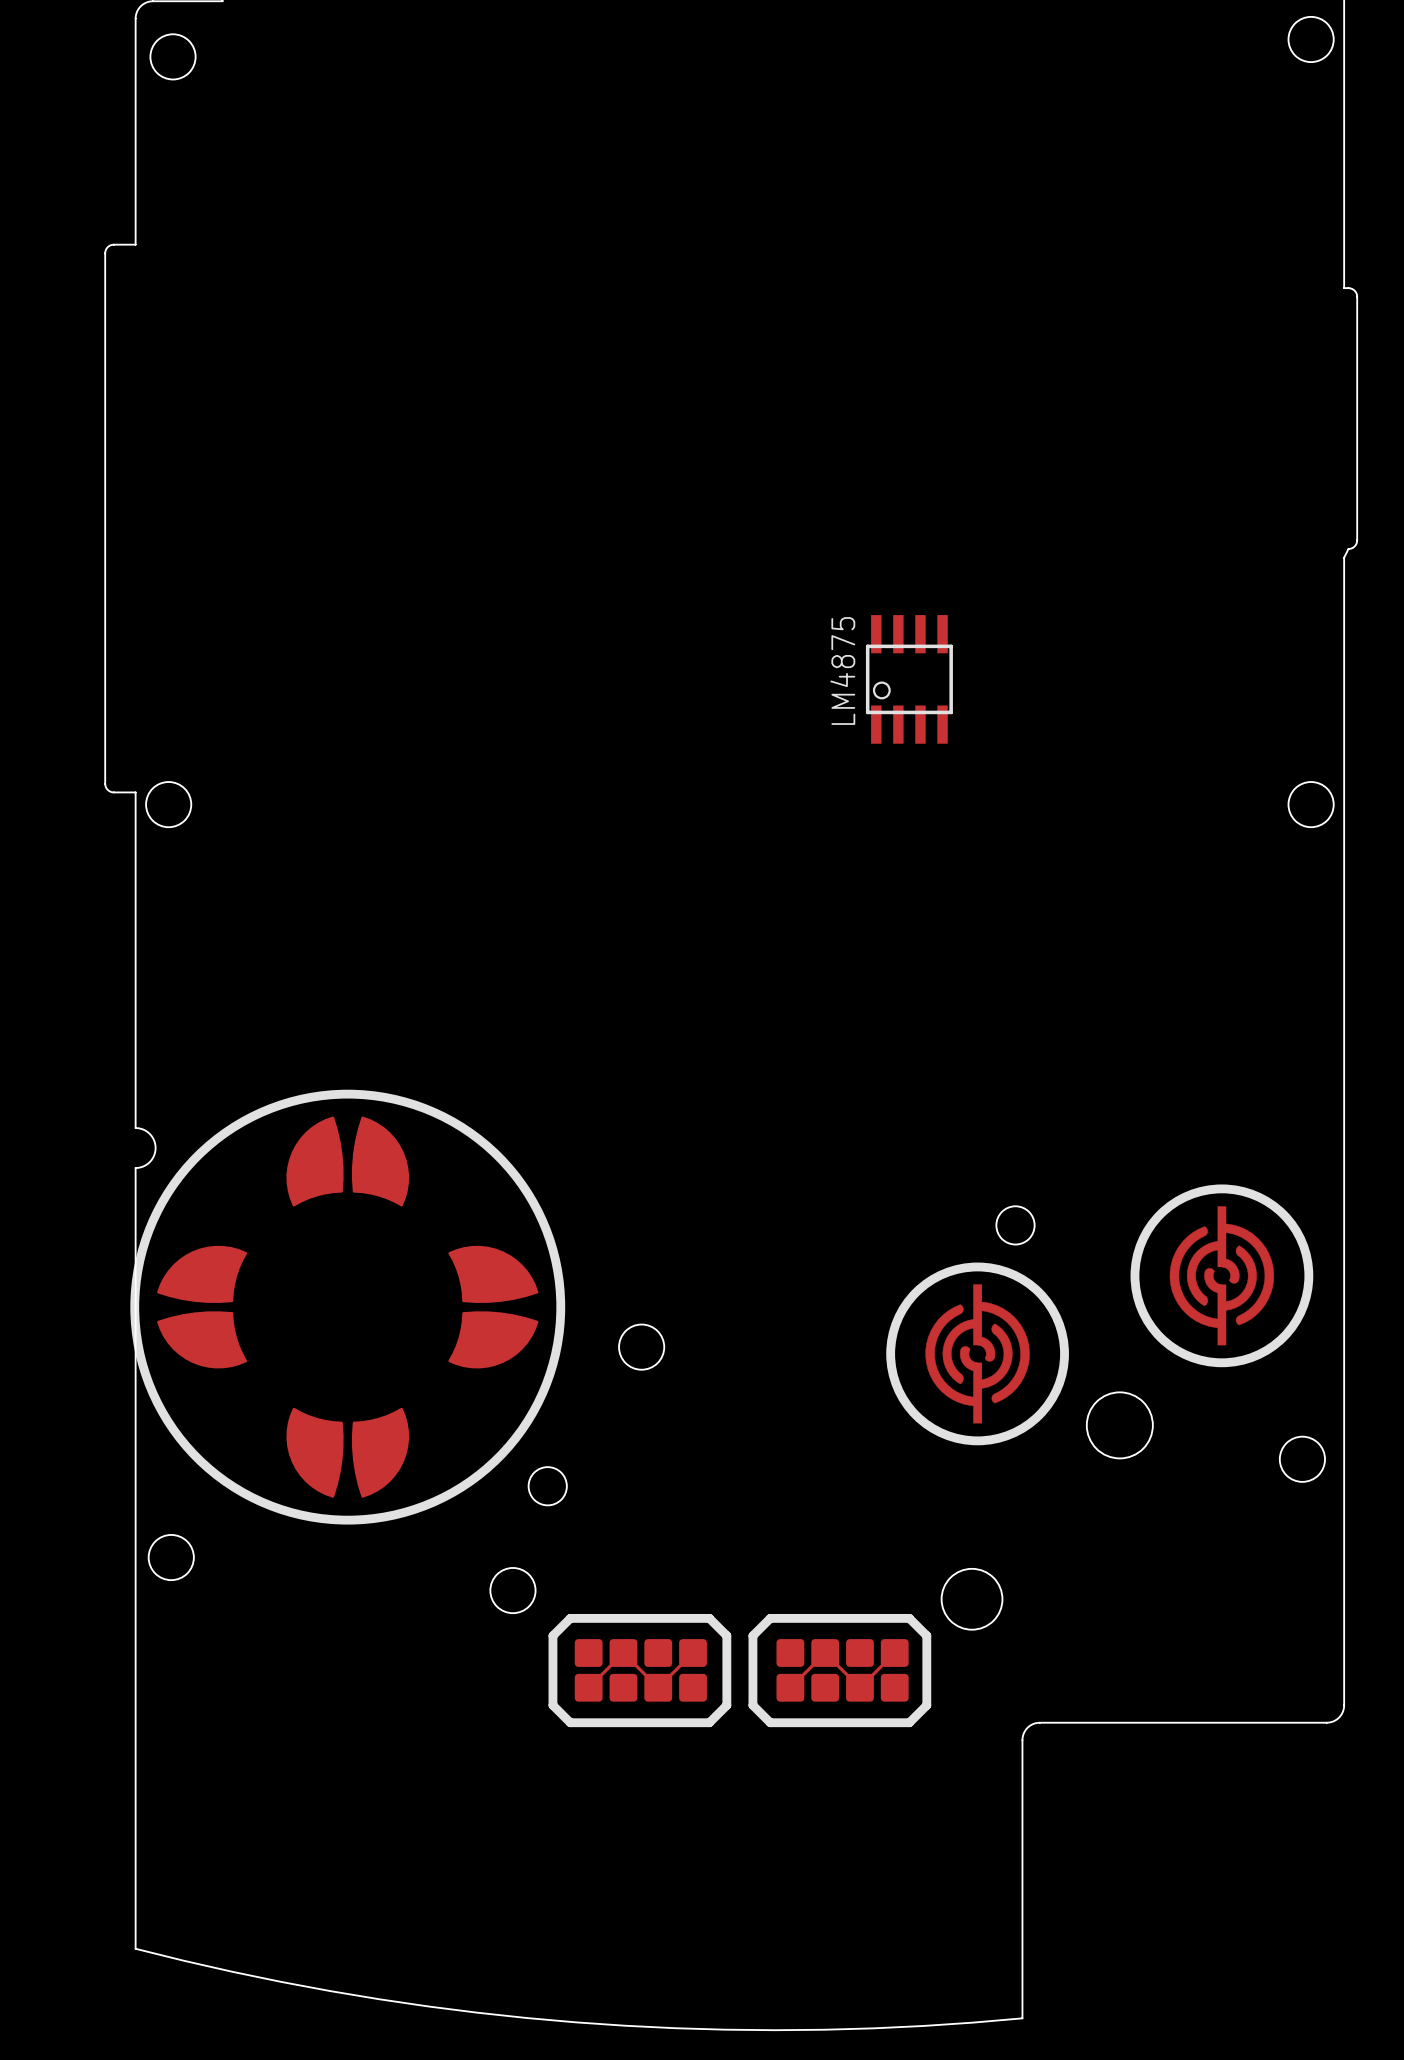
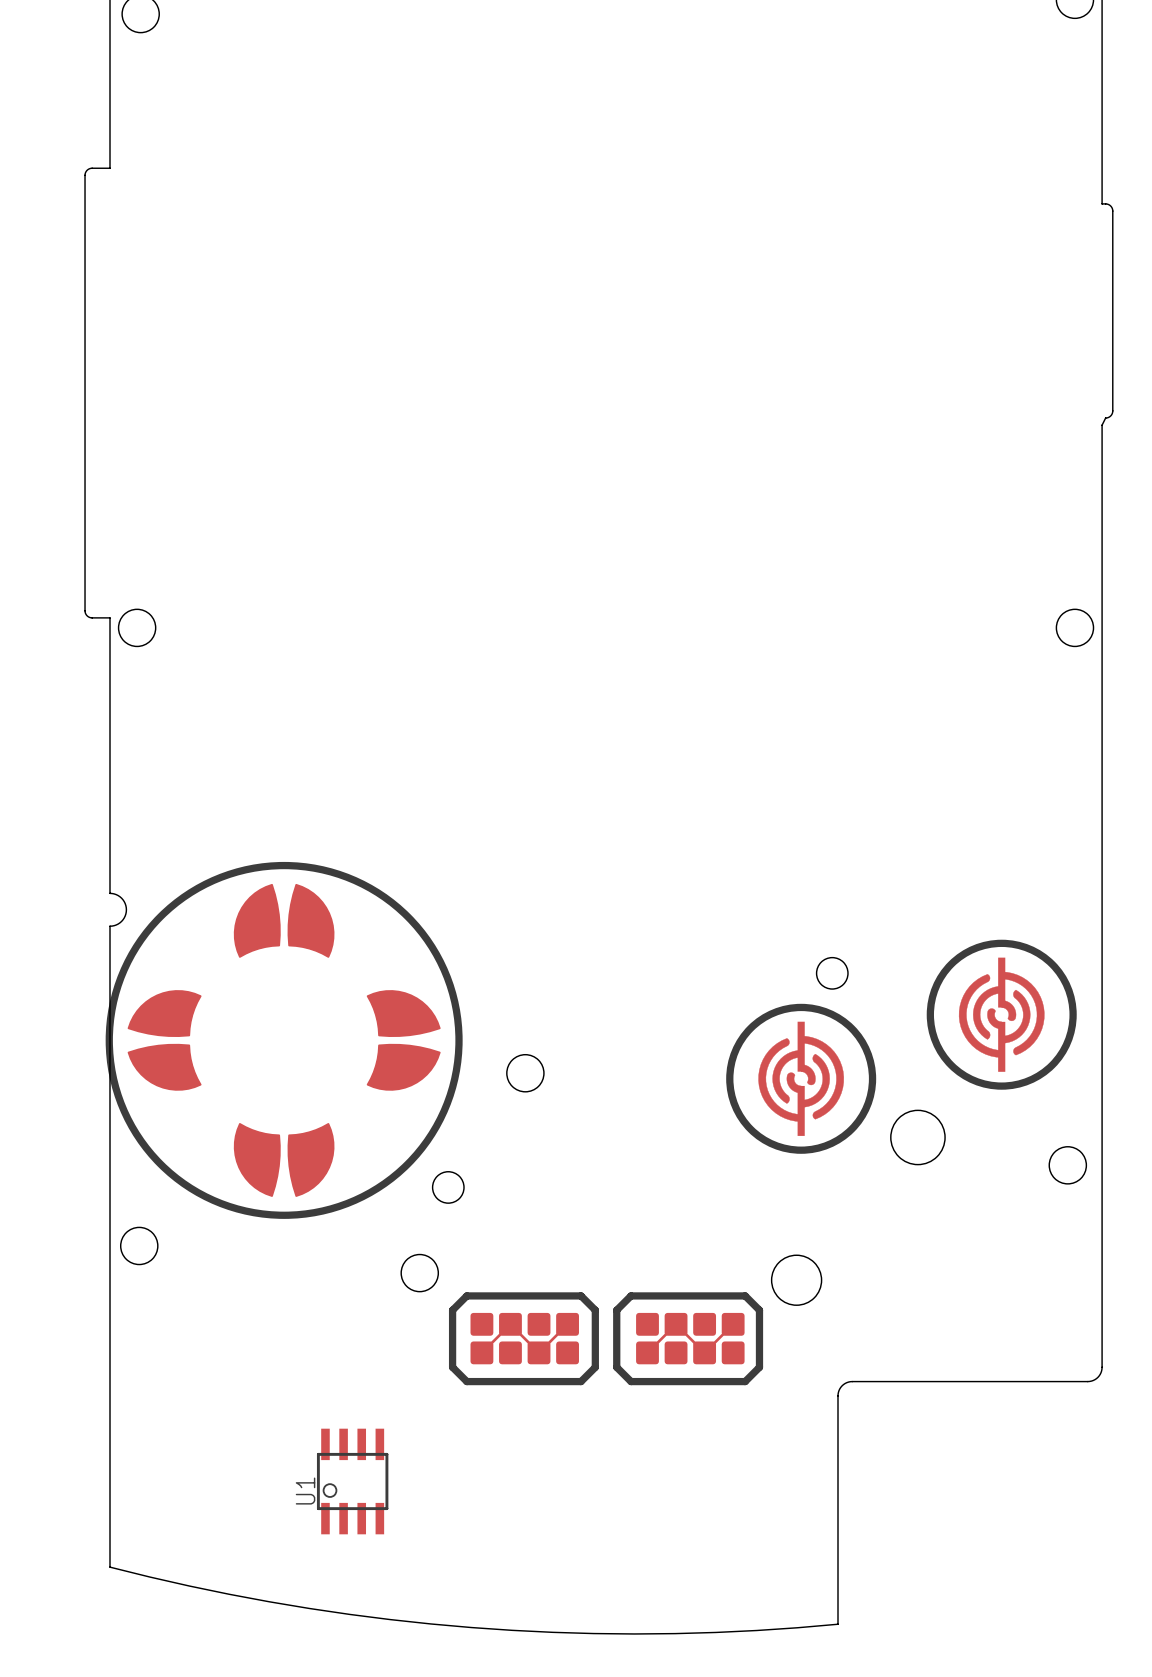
LM4875: (909, 679) -> none
U1: none -> (352, 1481)

